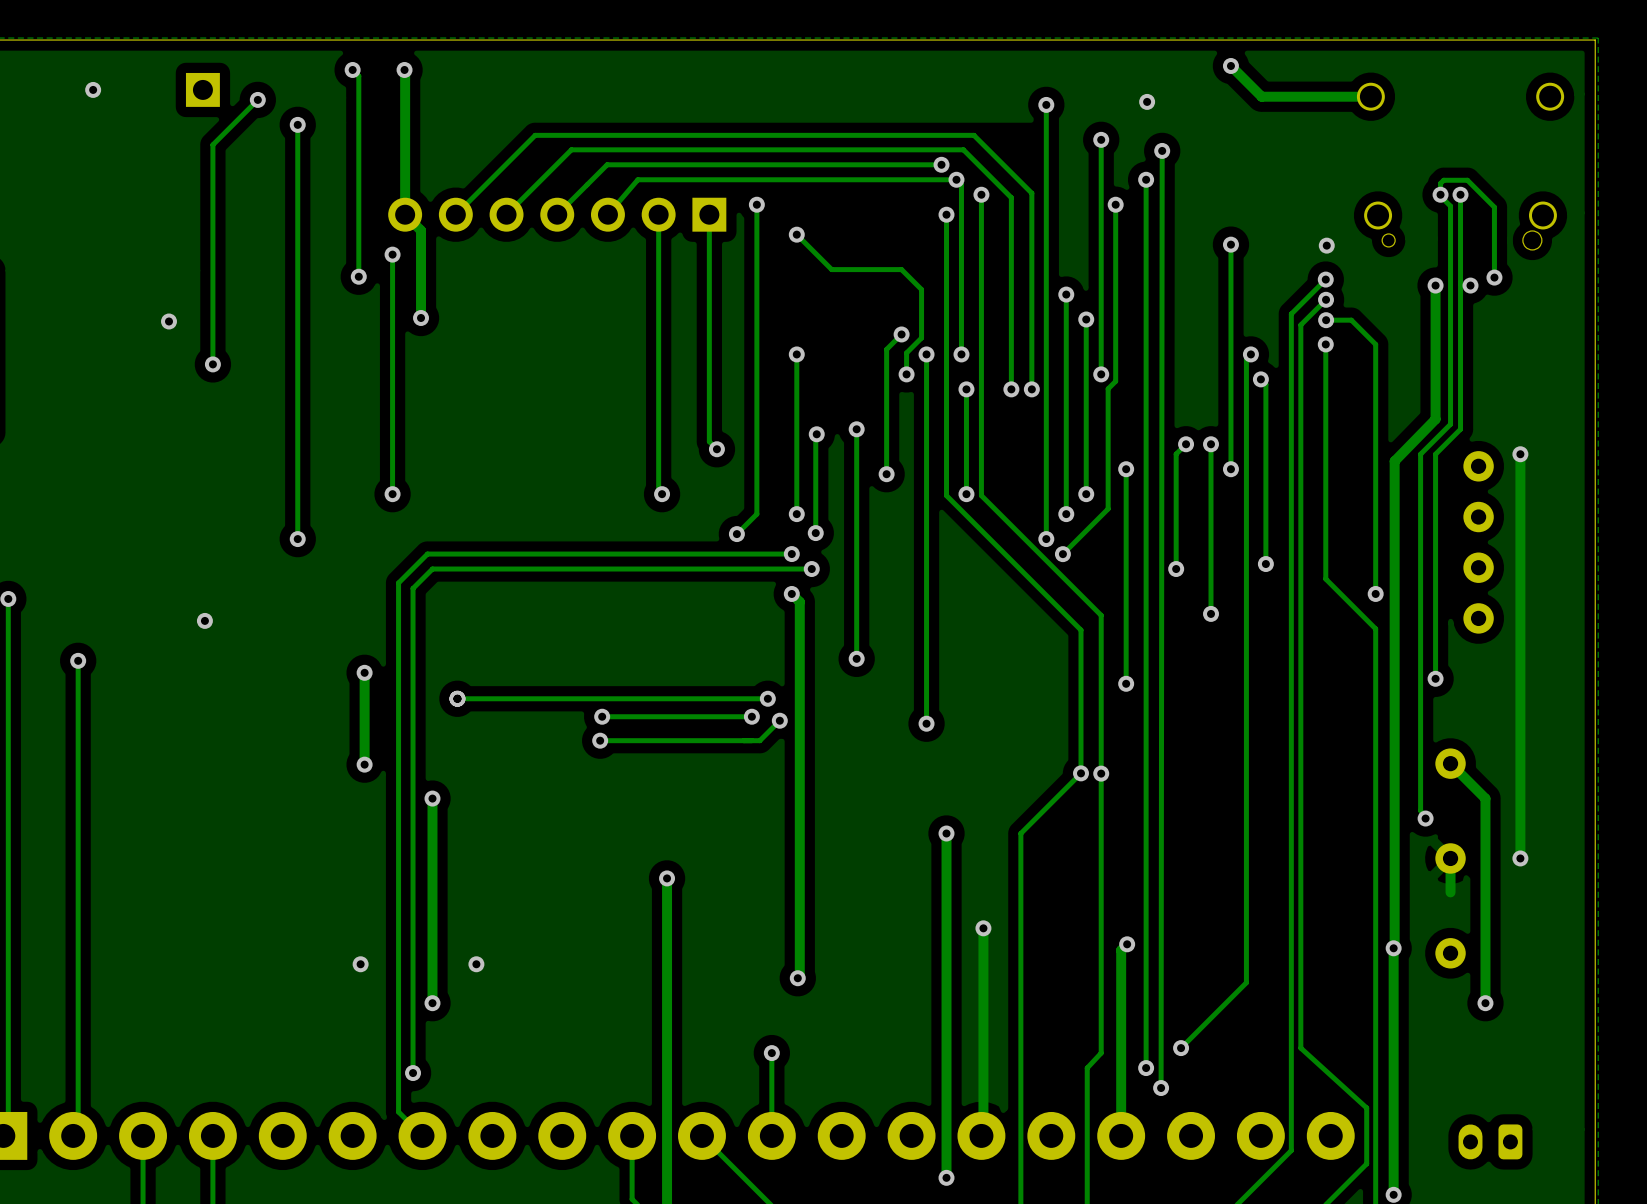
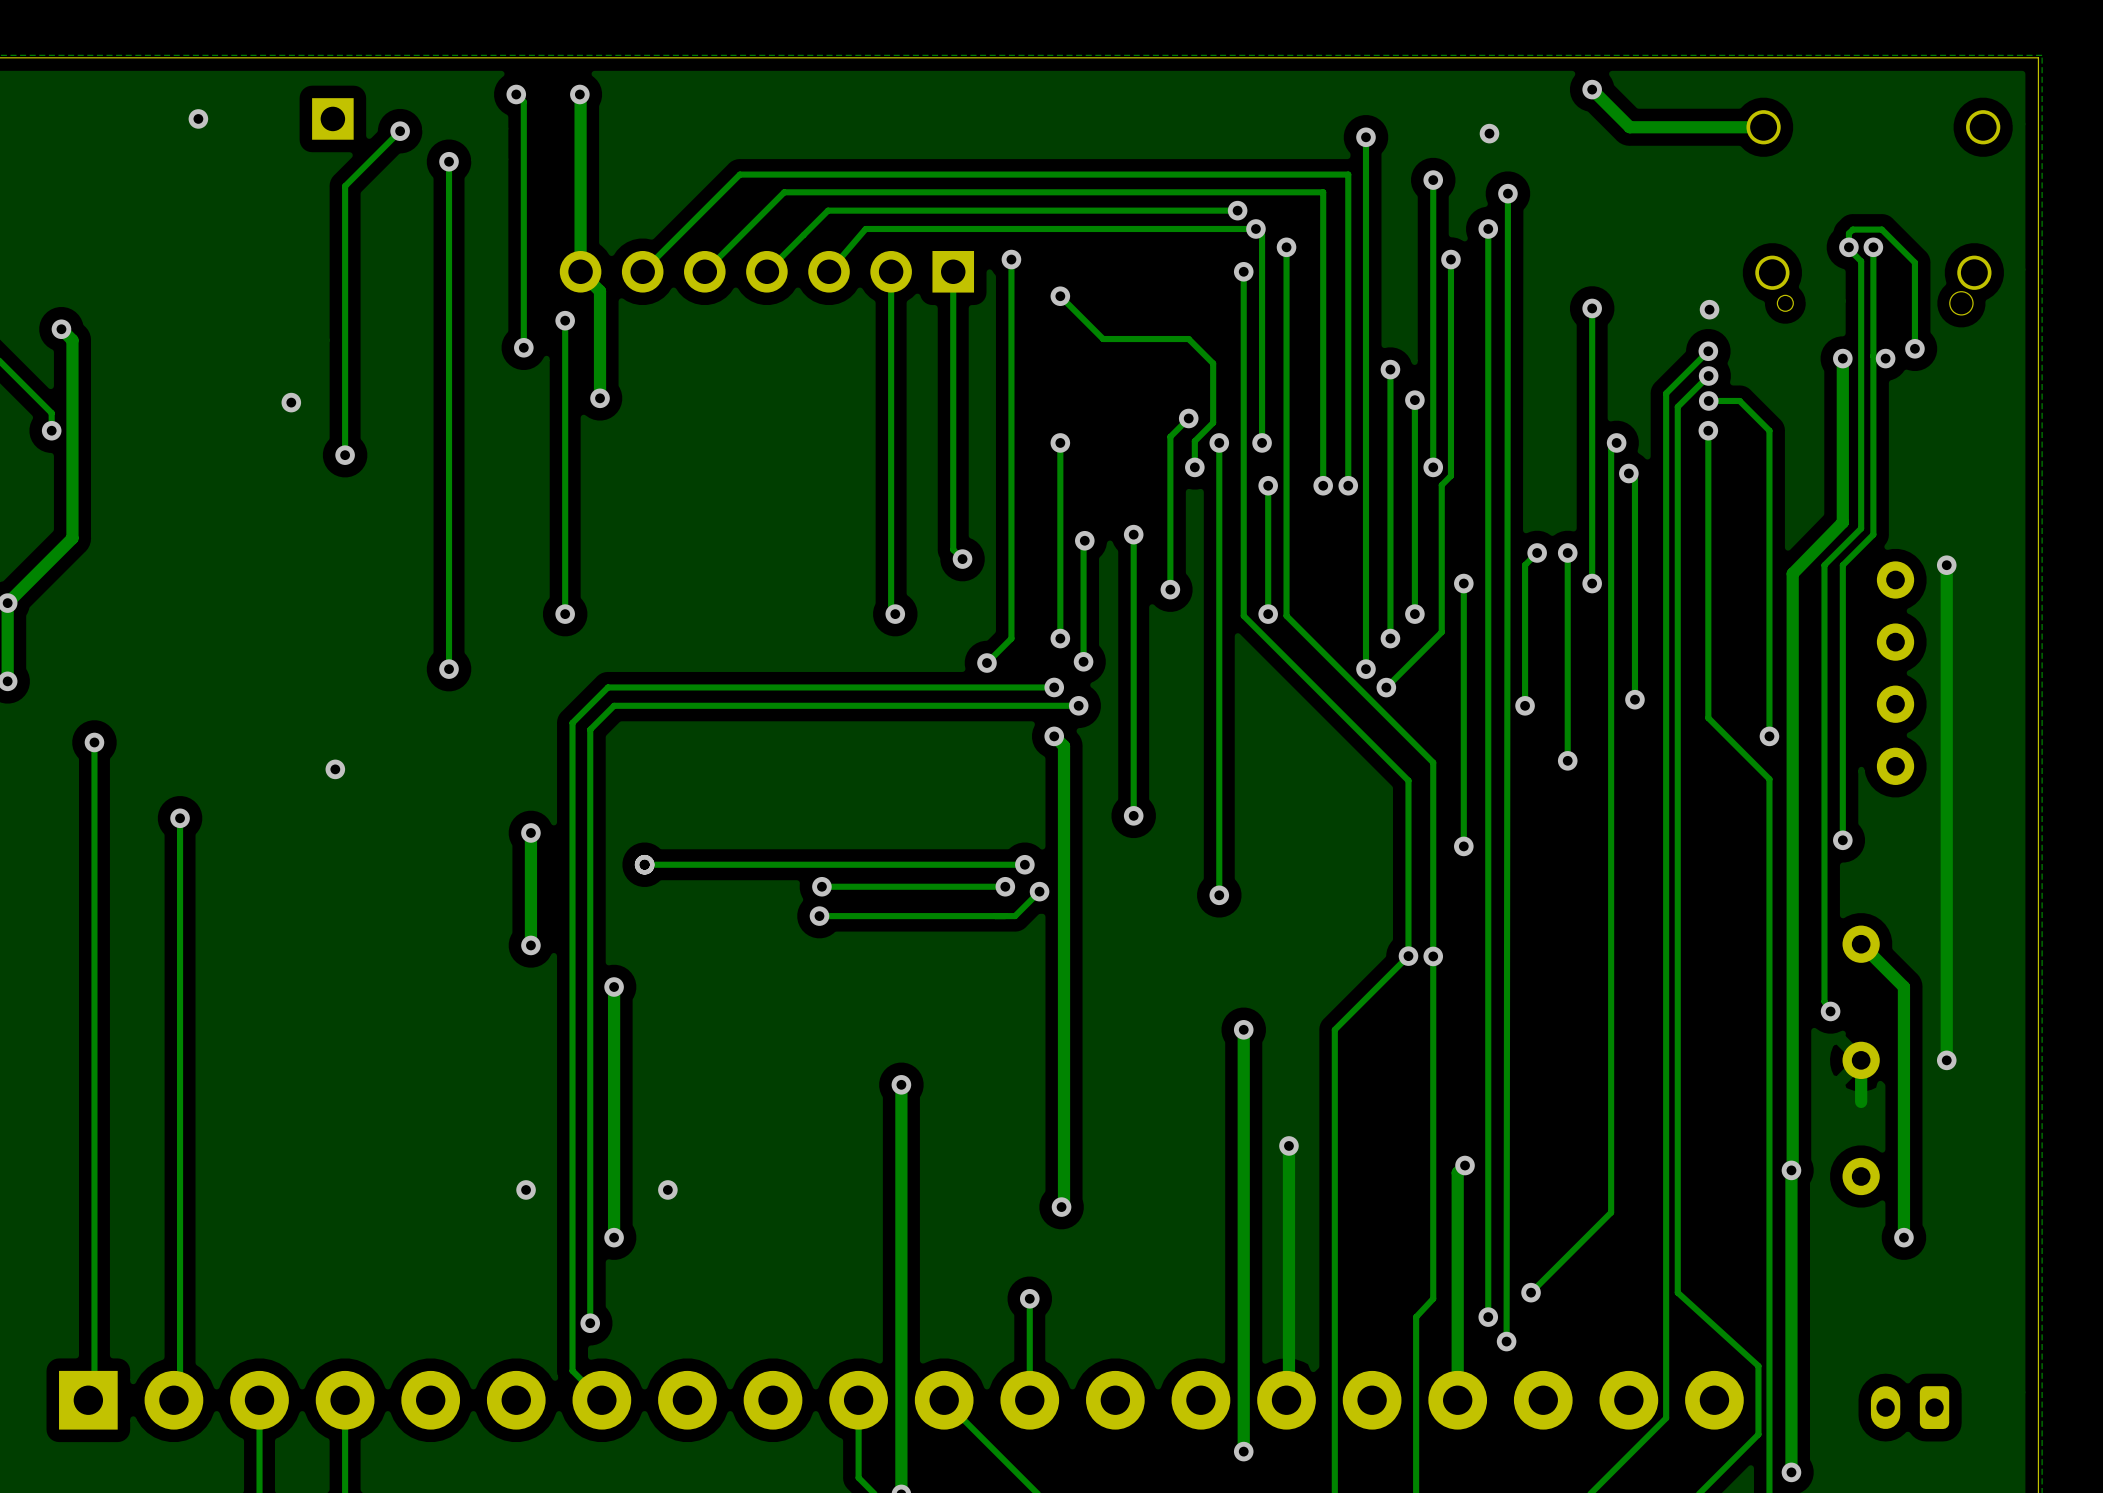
track: (973, 135) (1031, 193) -> (1277, 174) (1348, 174) (1348, 245)
track: (963, 149) (1011, 197) -> (1264, 192) (1323, 192) (1323, 250)

